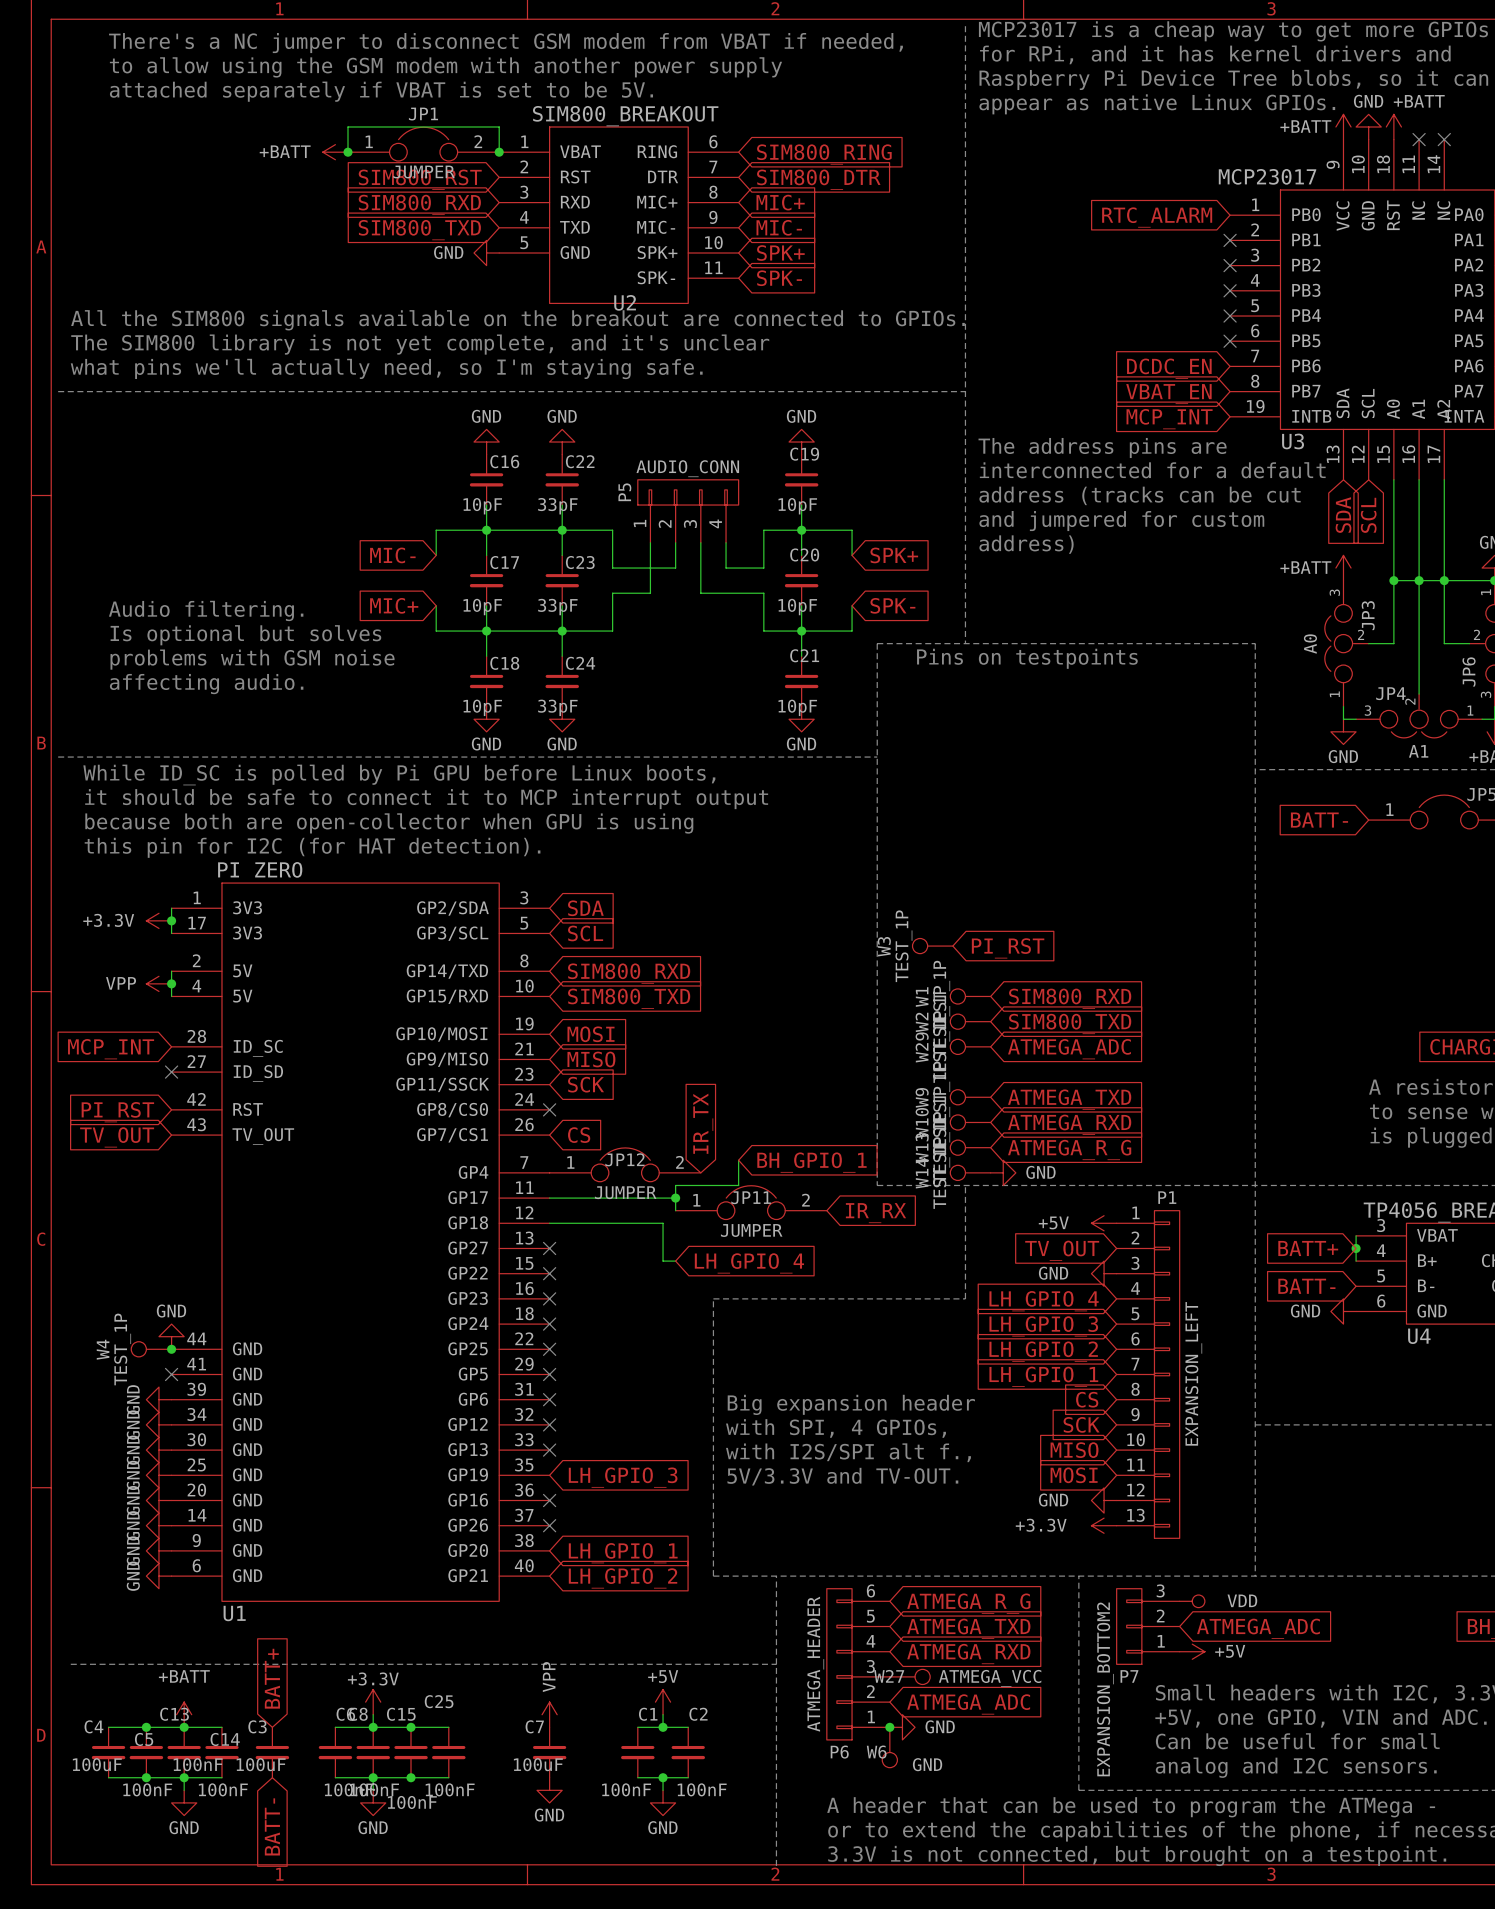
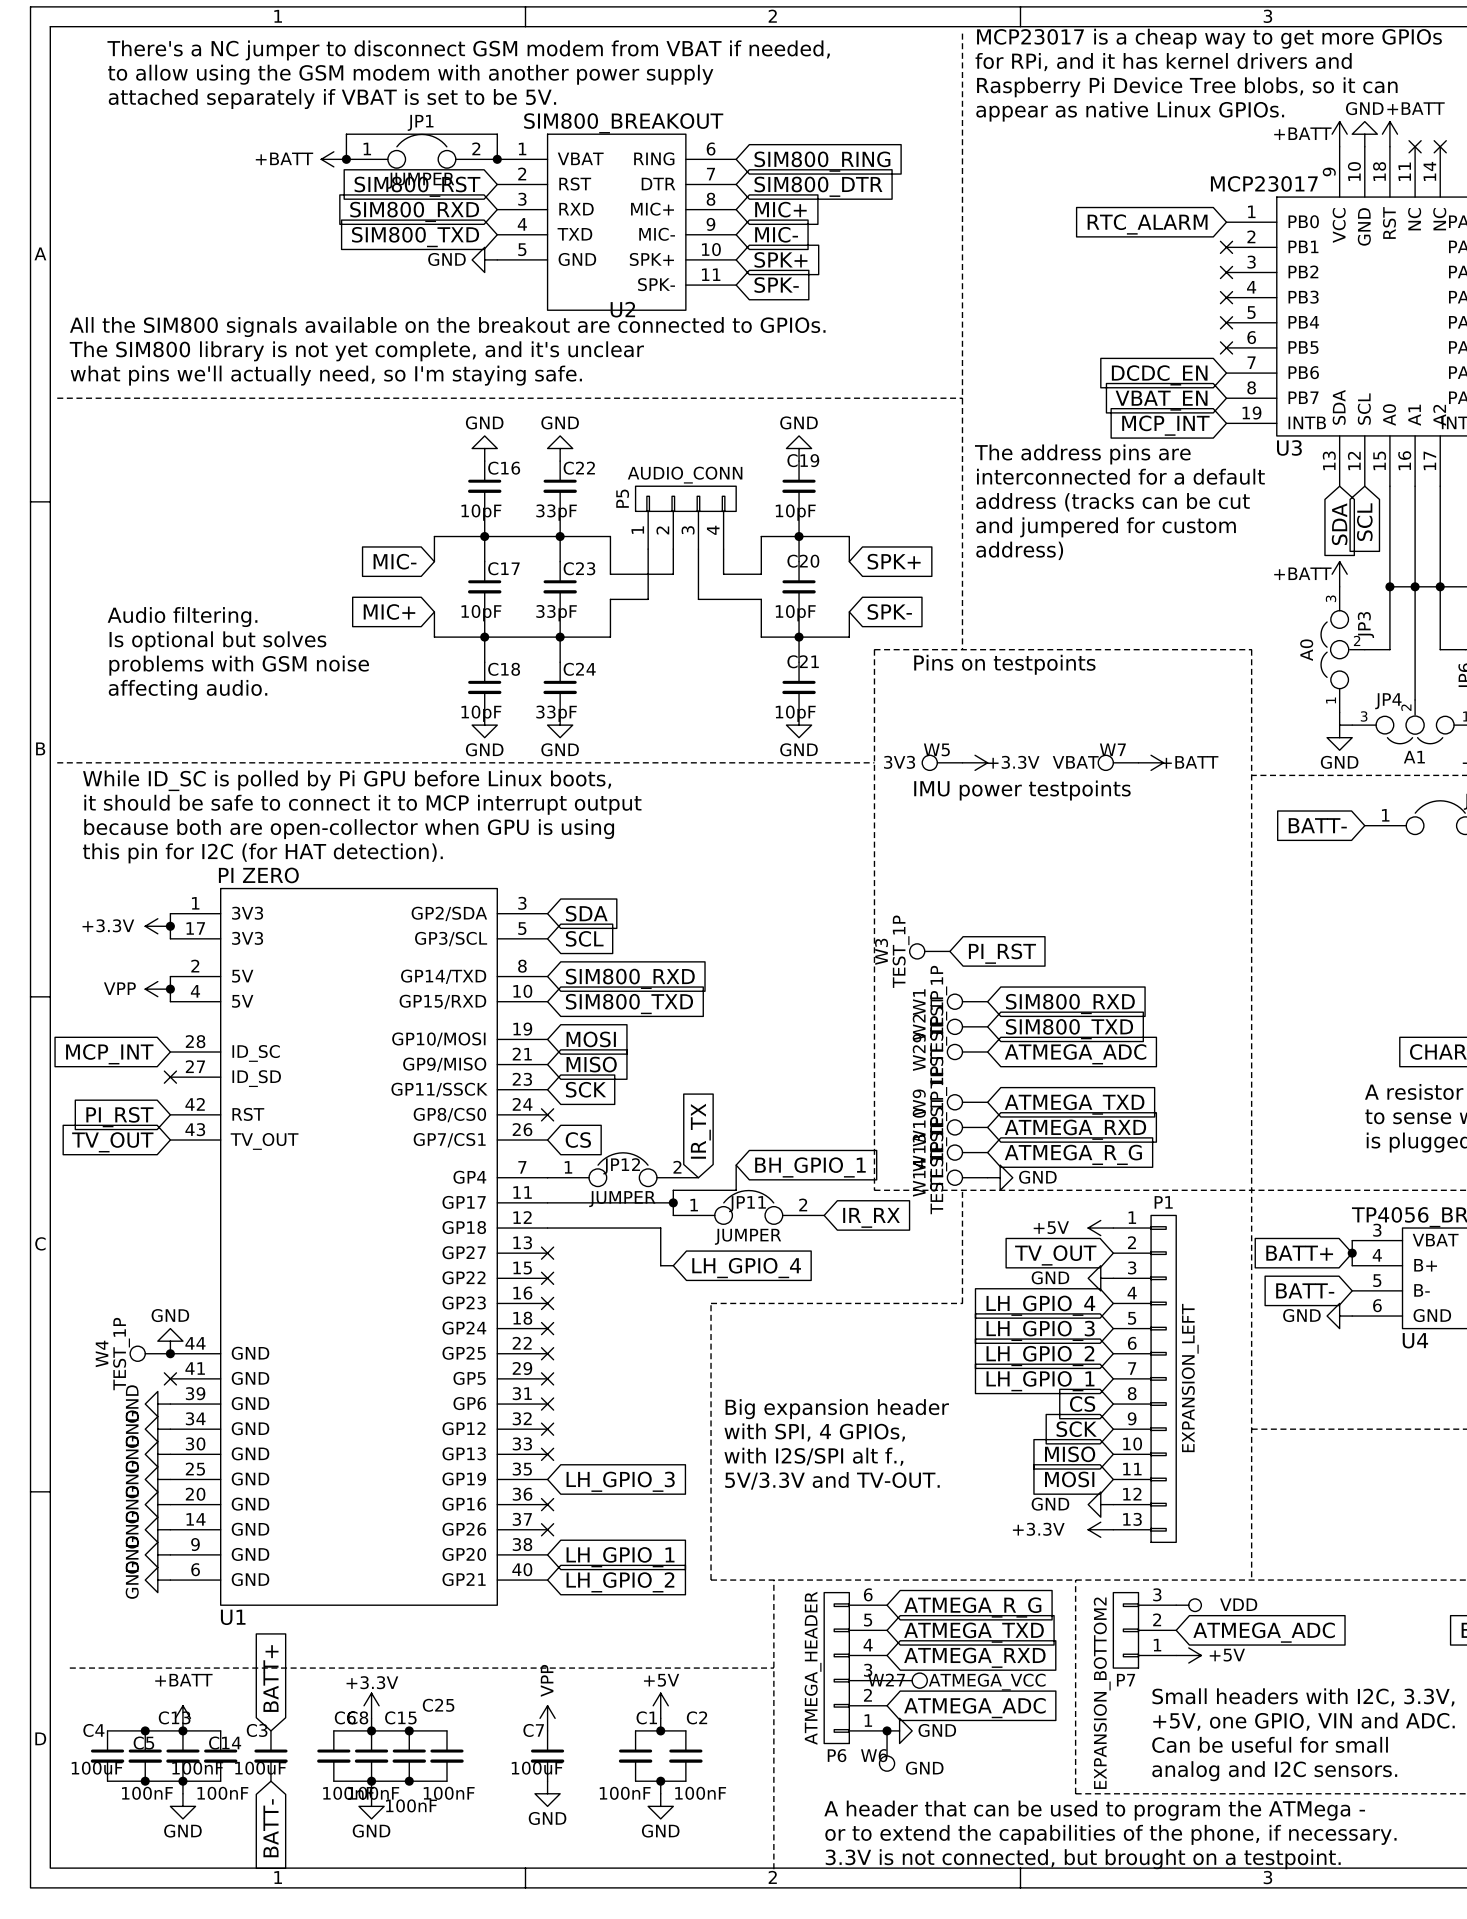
W5: none -> 3V3 (942, 762)
power symbol: none -> +3.3V (975, 762)
W7: none -> VBAT (1118, 762)
power symbol: none -> +BATT (1151, 762)
text: none -> IMU power testpoints (1022, 790)

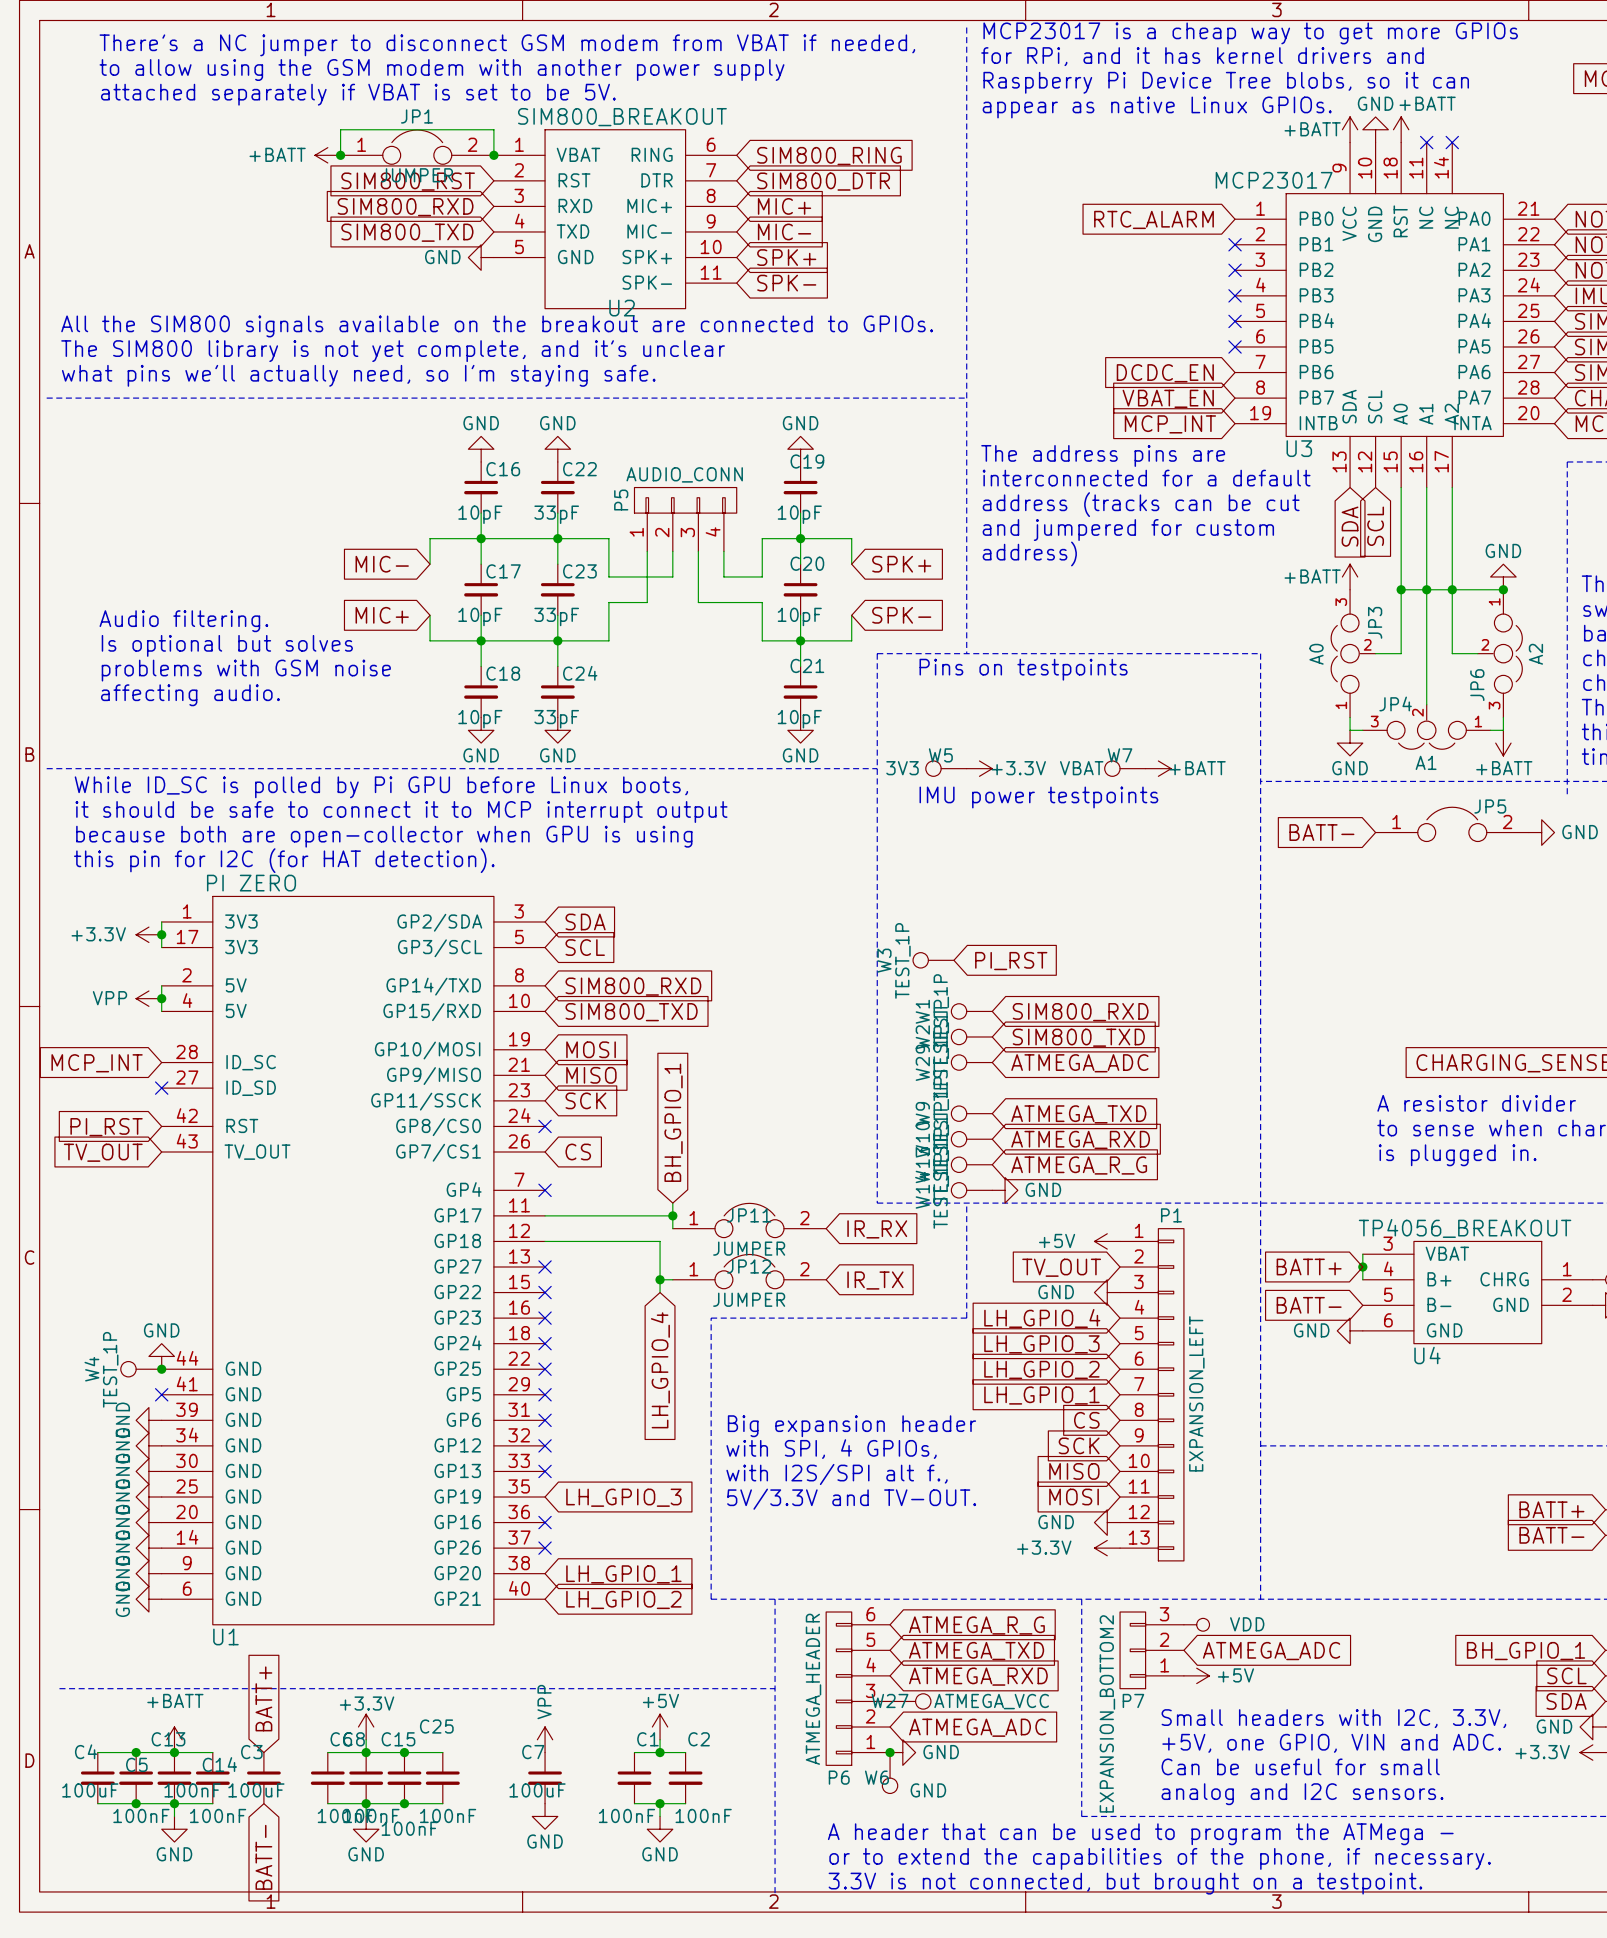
global label rotation: 0° (700, 1131) -> 90° clockwise (875, 1280)
global label position: IR_TX (700, 1131) -> IR_TX (875, 1280)
wire: (736, 1165) (736, 1190) (673, 1190) -> none
global label rotation: 0° (810, 1167) -> 90° counterclockwise (673, 1122)
JP12 position: (623, 1169) -> (749, 1271)
no-connect mark: none -> (545, 1190)
wire: none -> (660, 1279) (660, 1292)
junction: none -> (660, 1279)
global label rotation: 0° (746, 1268) -> 90° clockwise (660, 1370)

